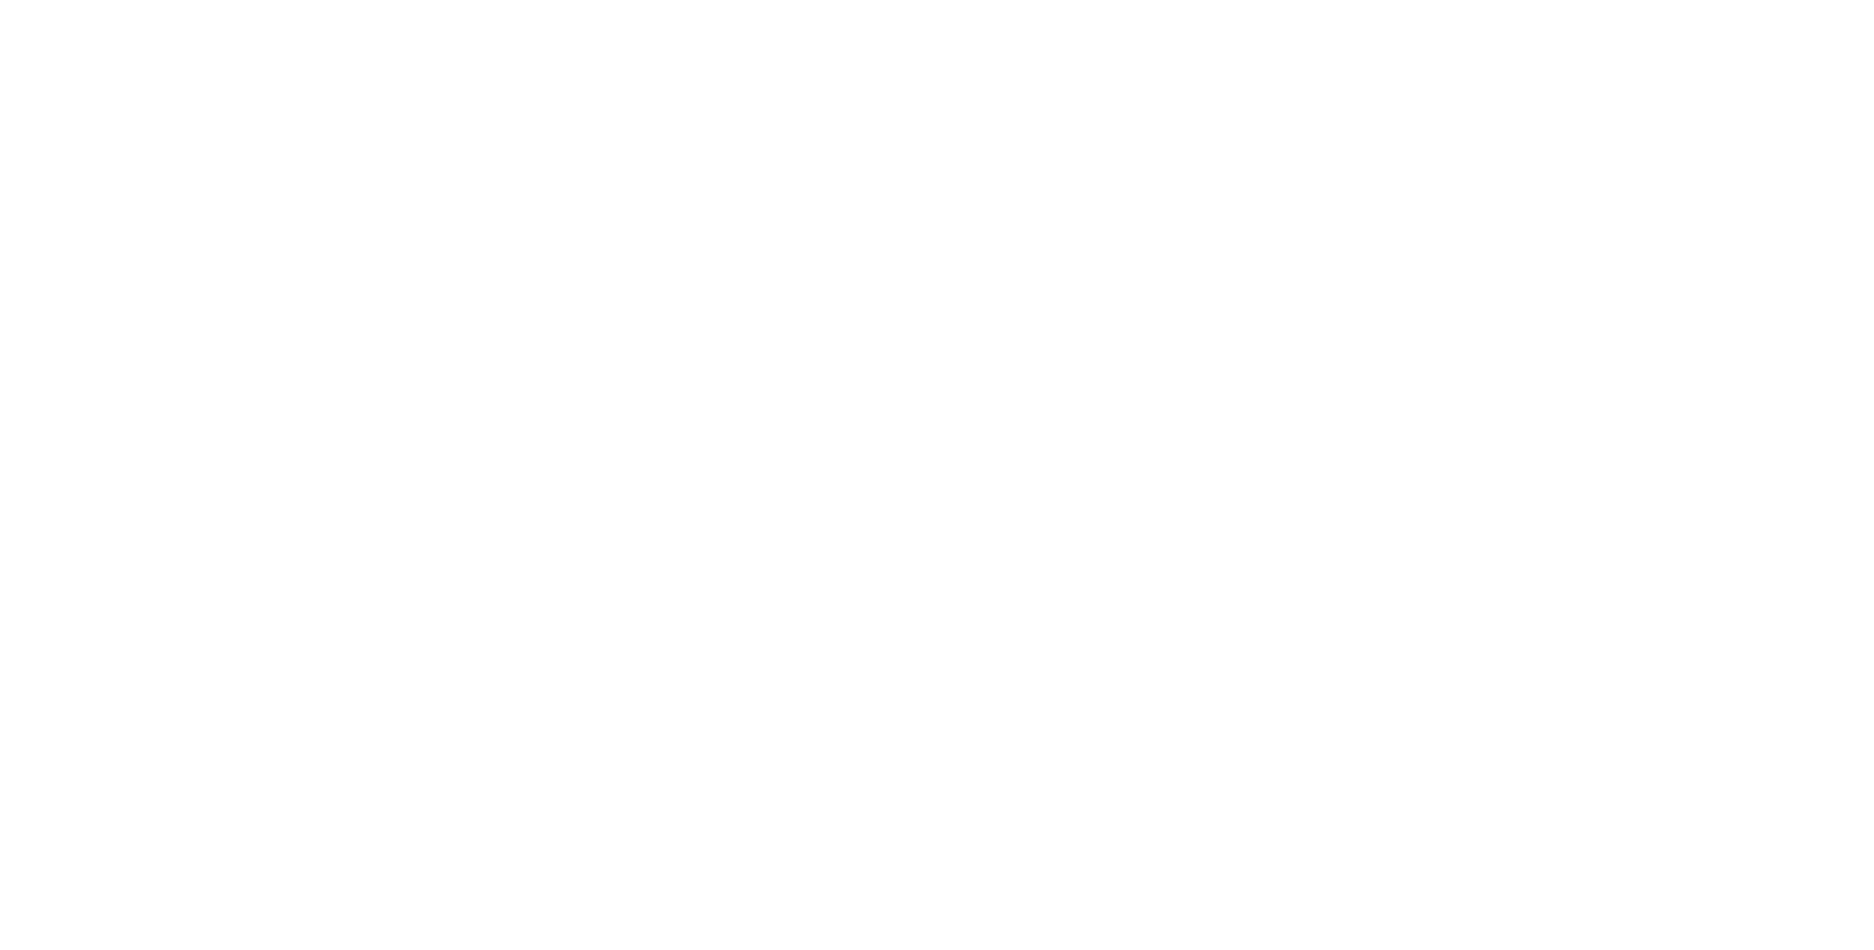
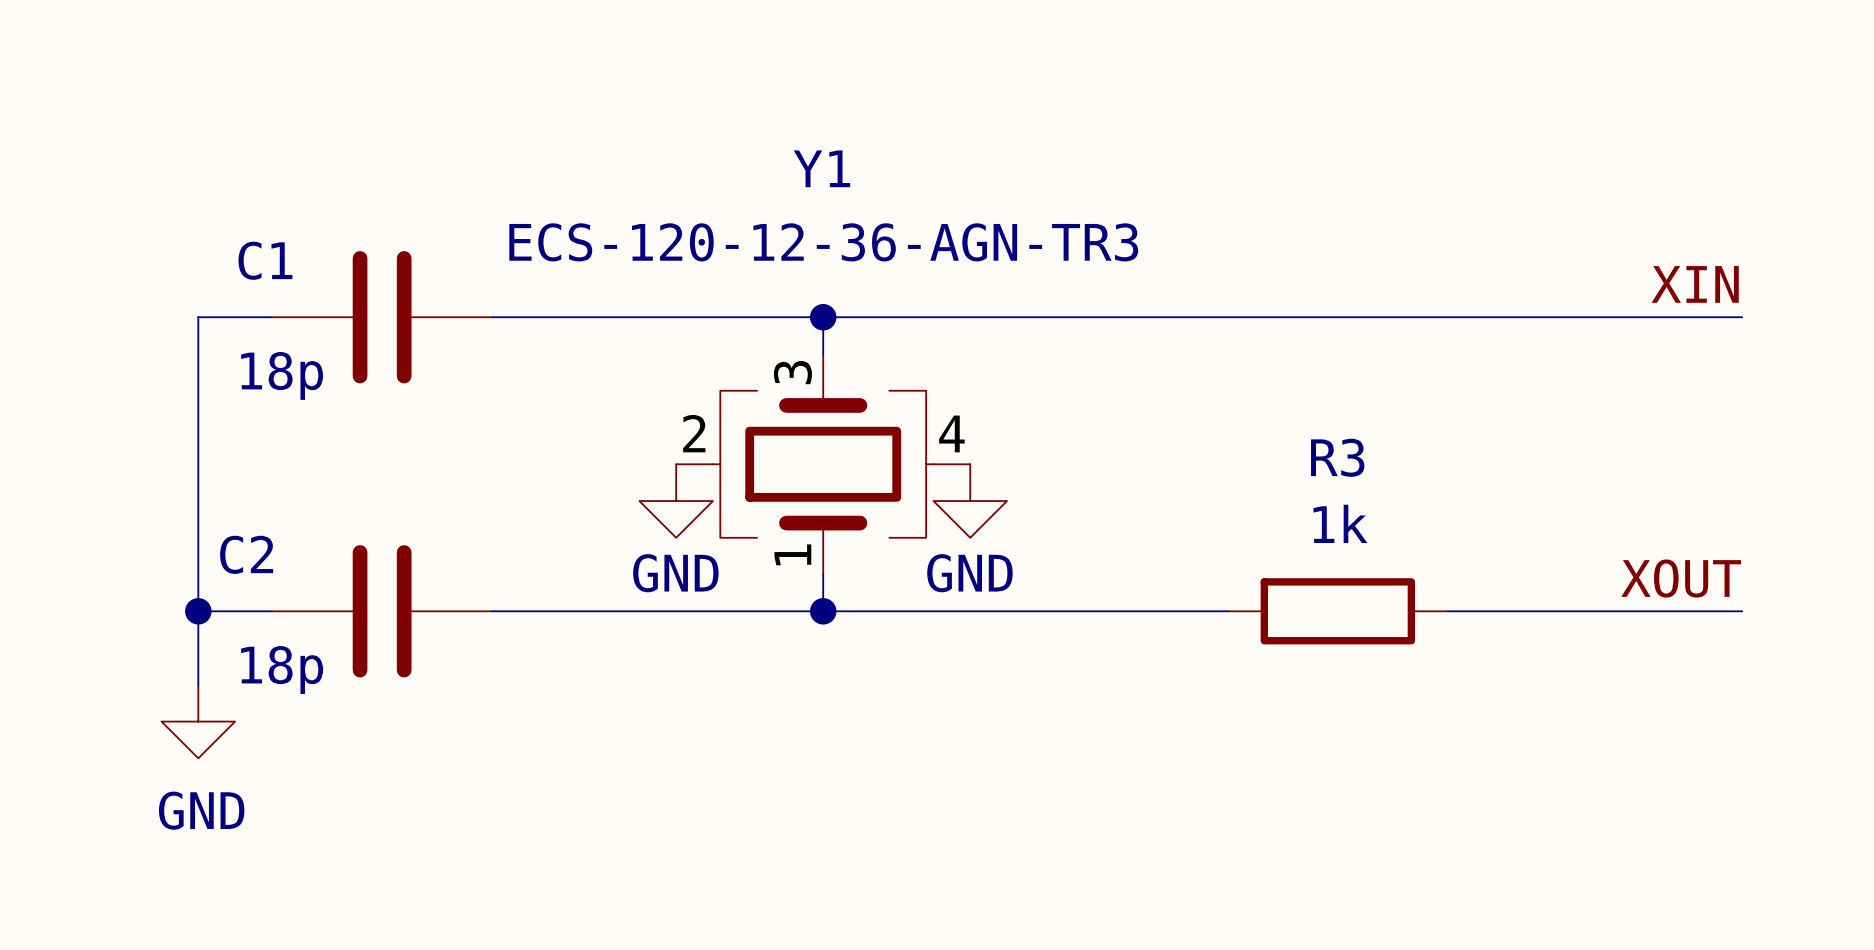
label: none -> XIN (1695, 284)
wire: none -> (271, 317) (198, 317) (198, 684)
C1: none -> 18p (382, 317)
wire: none -> (492, 317) (1742, 317)
wire: none -> (823, 317) (823, 353)
junction: none -> (823, 317)
Y1: none -> ECS-120-12-36-AGN-TR3 (823, 464)
power symbol: none -> GND (676, 501)
power symbol: none -> GND (970, 501)
wire: none -> (823, 574) (823, 611)
label: none -> XOUT (1681, 578)
wire: none -> (198, 611) (271, 611)
junction: none -> (198, 611)
C2: none -> 18p (382, 611)
wire: none -> (492, 611) (1227, 611)
junction: none -> (823, 611)
R3: none -> 1k (1337, 611)
wire: none -> (1448, 611) (1742, 611)
power symbol: none -> GND (198, 721)

